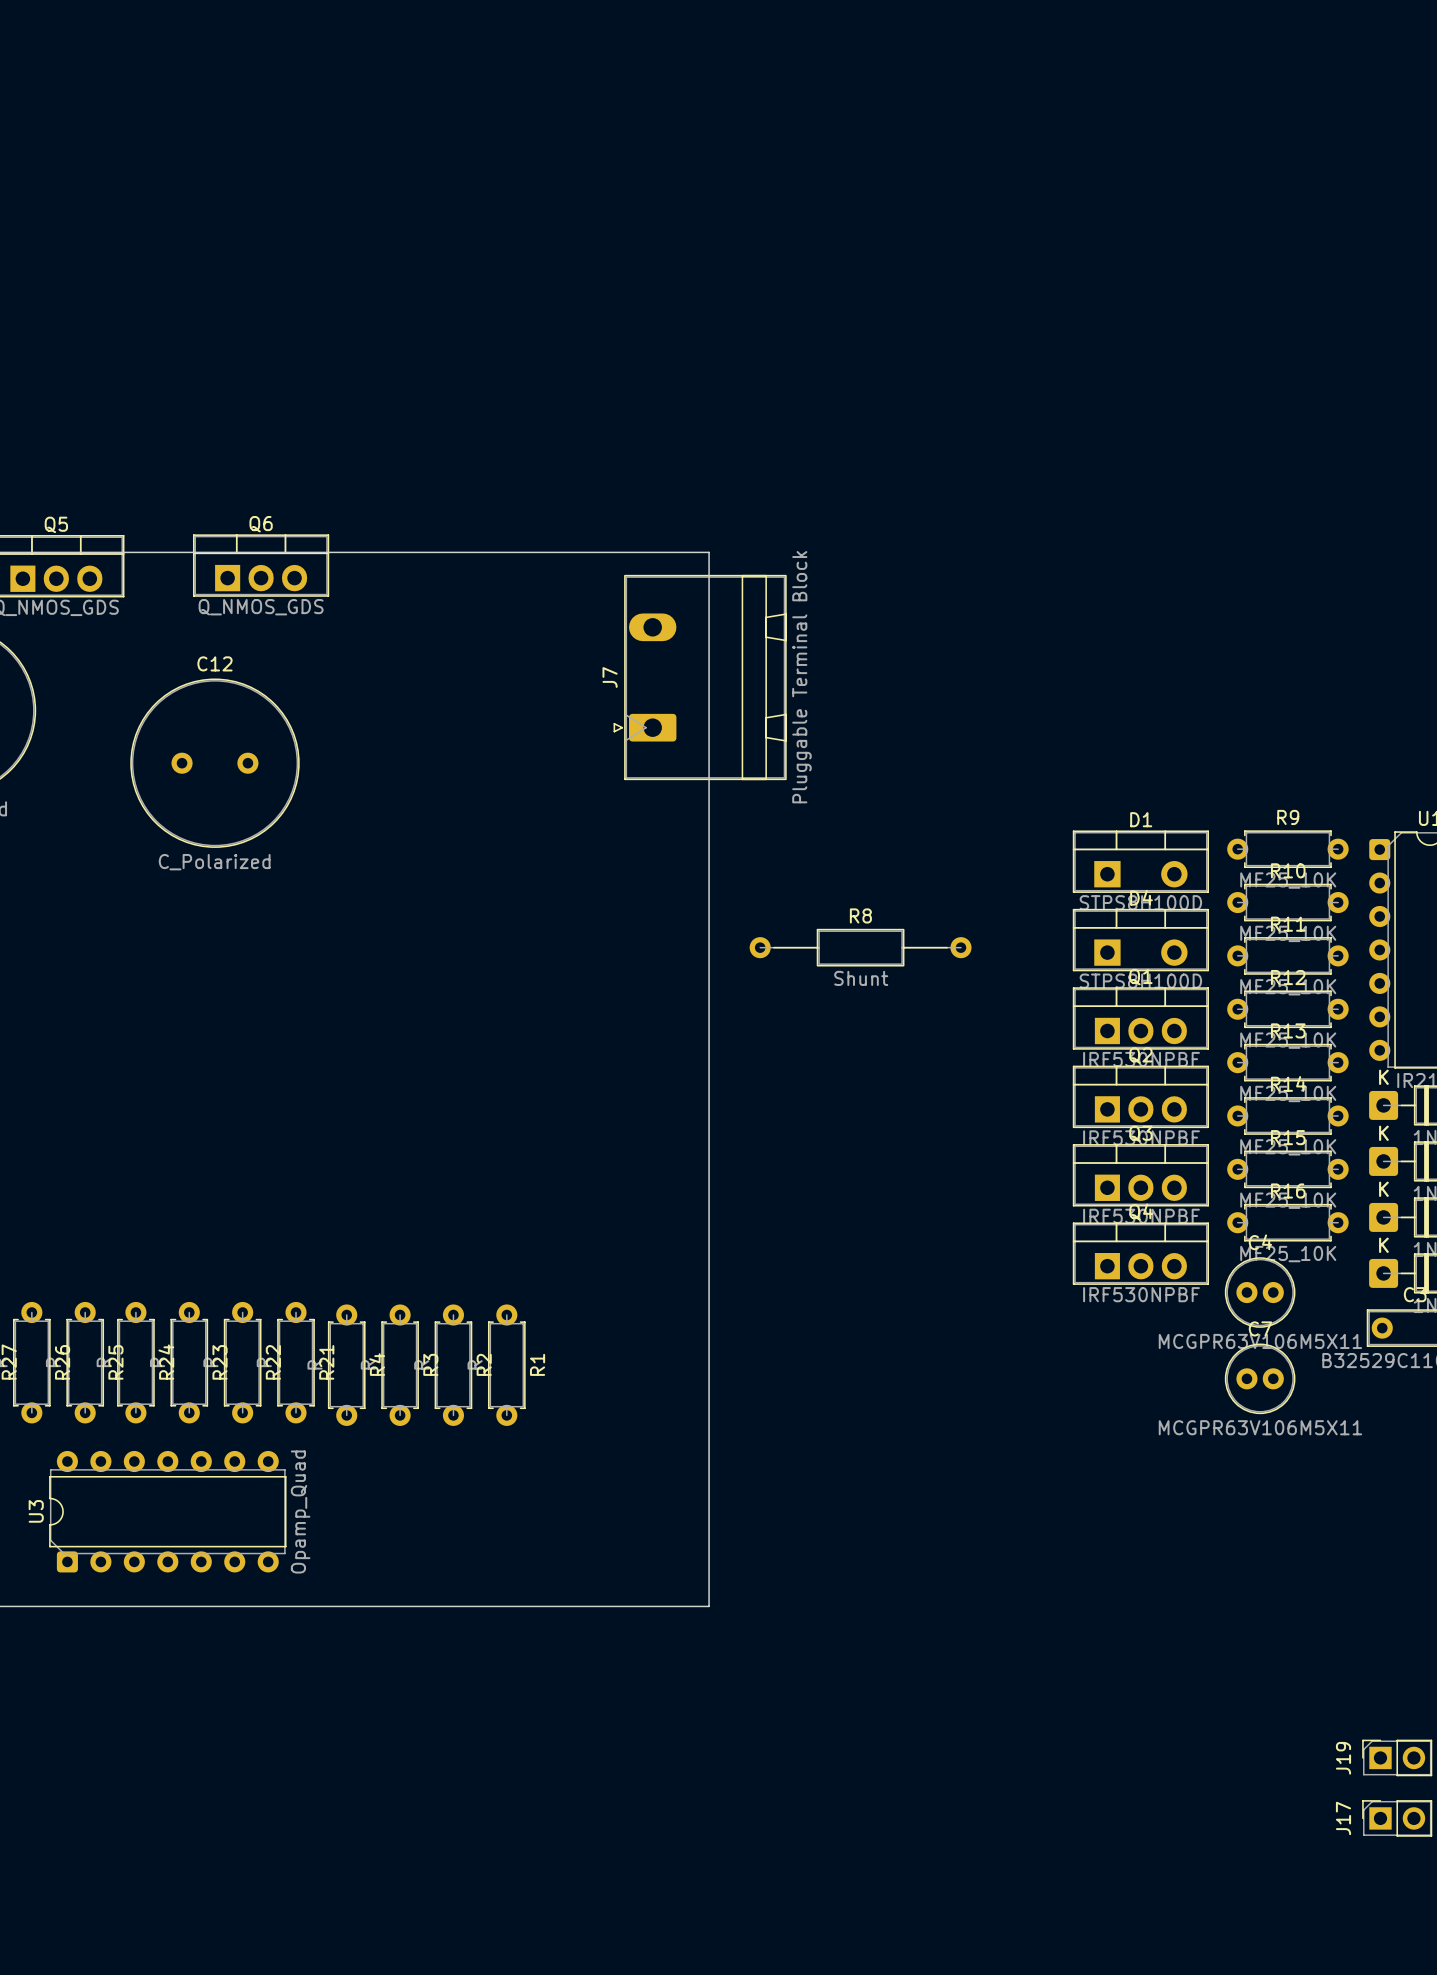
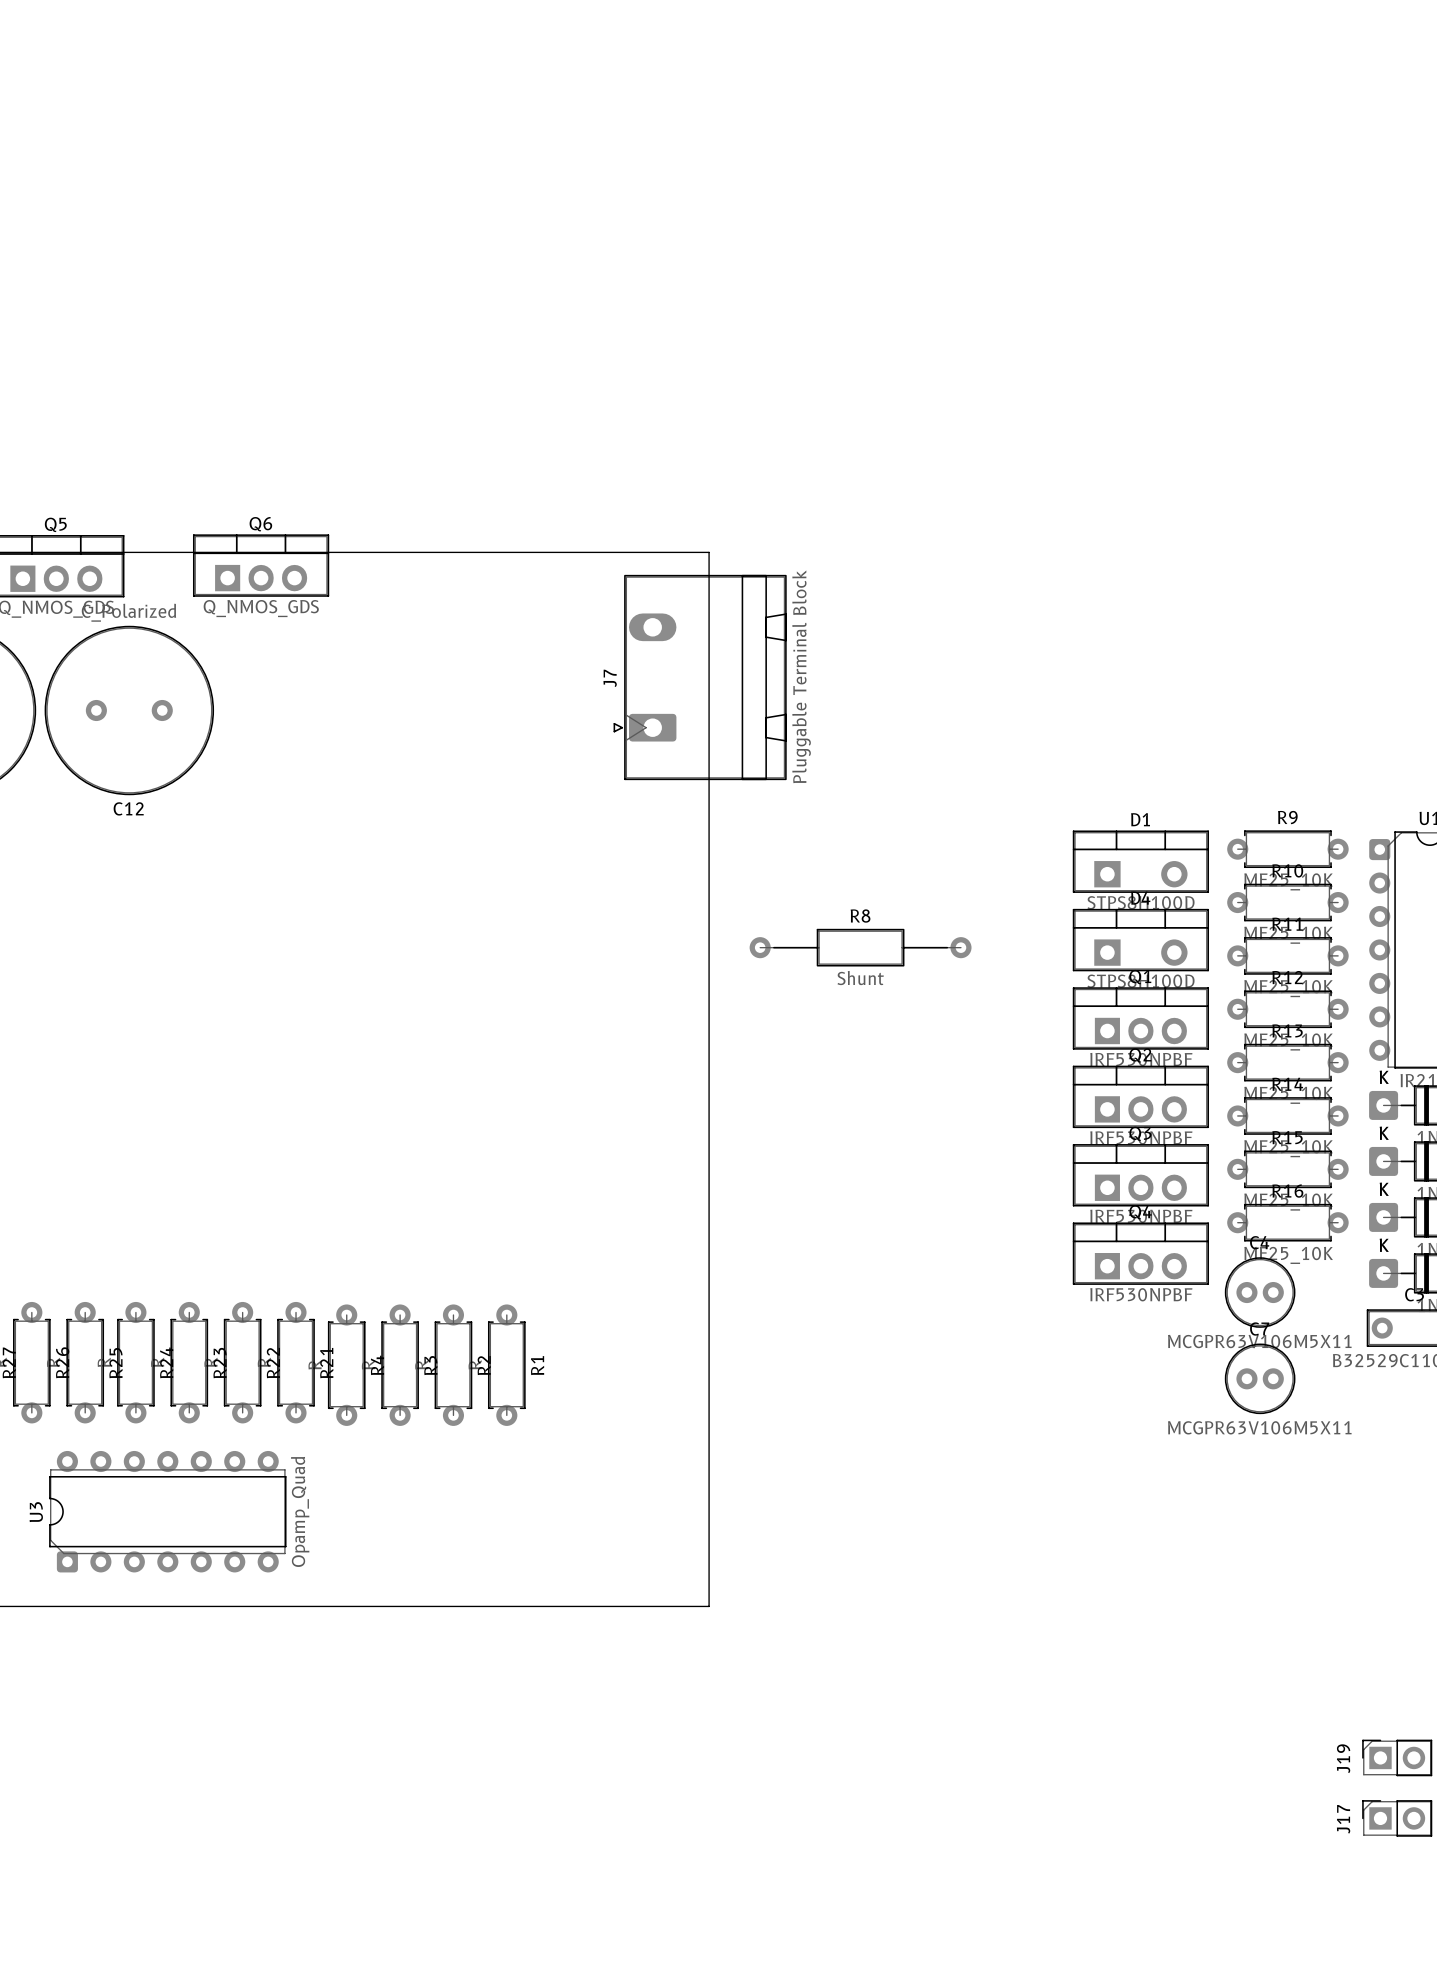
C12 name position: C12 (214, 663) -> C12 (128, 808)
C12 position: (214, 763) -> (129, 710)
C12 value position: C_Polarized (214, 862) -> C_Polarized (128, 612)

